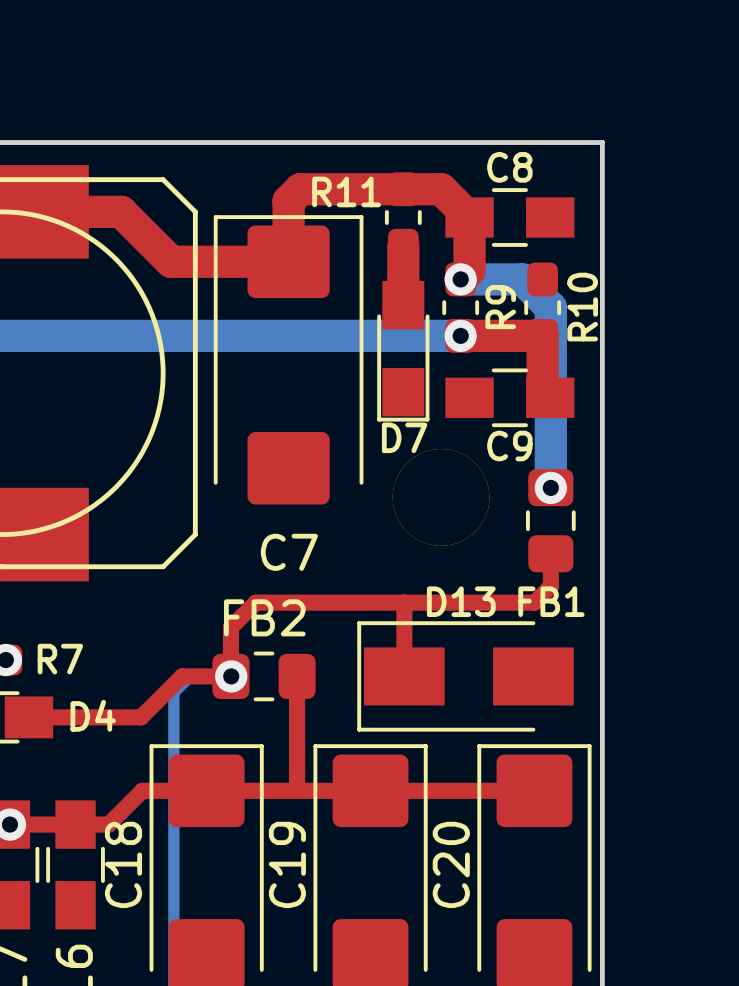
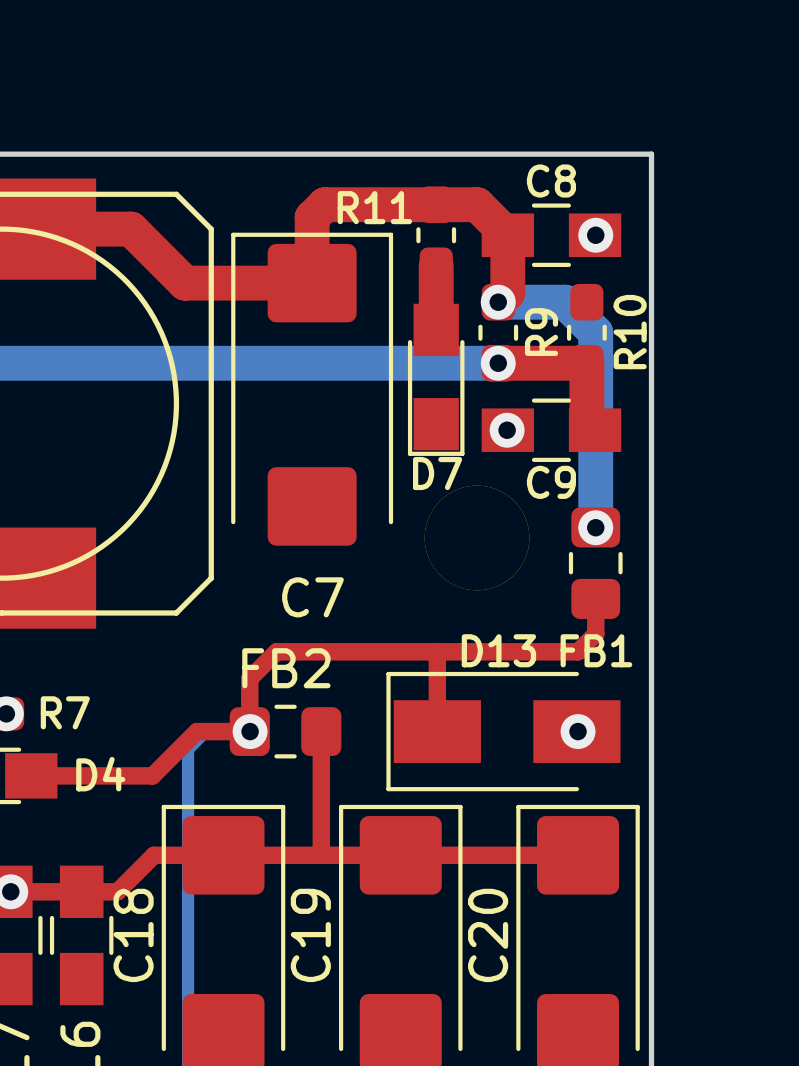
via: none -> (595, 235)
via: none -> (507, 430)
via: none -> (578, 731)

